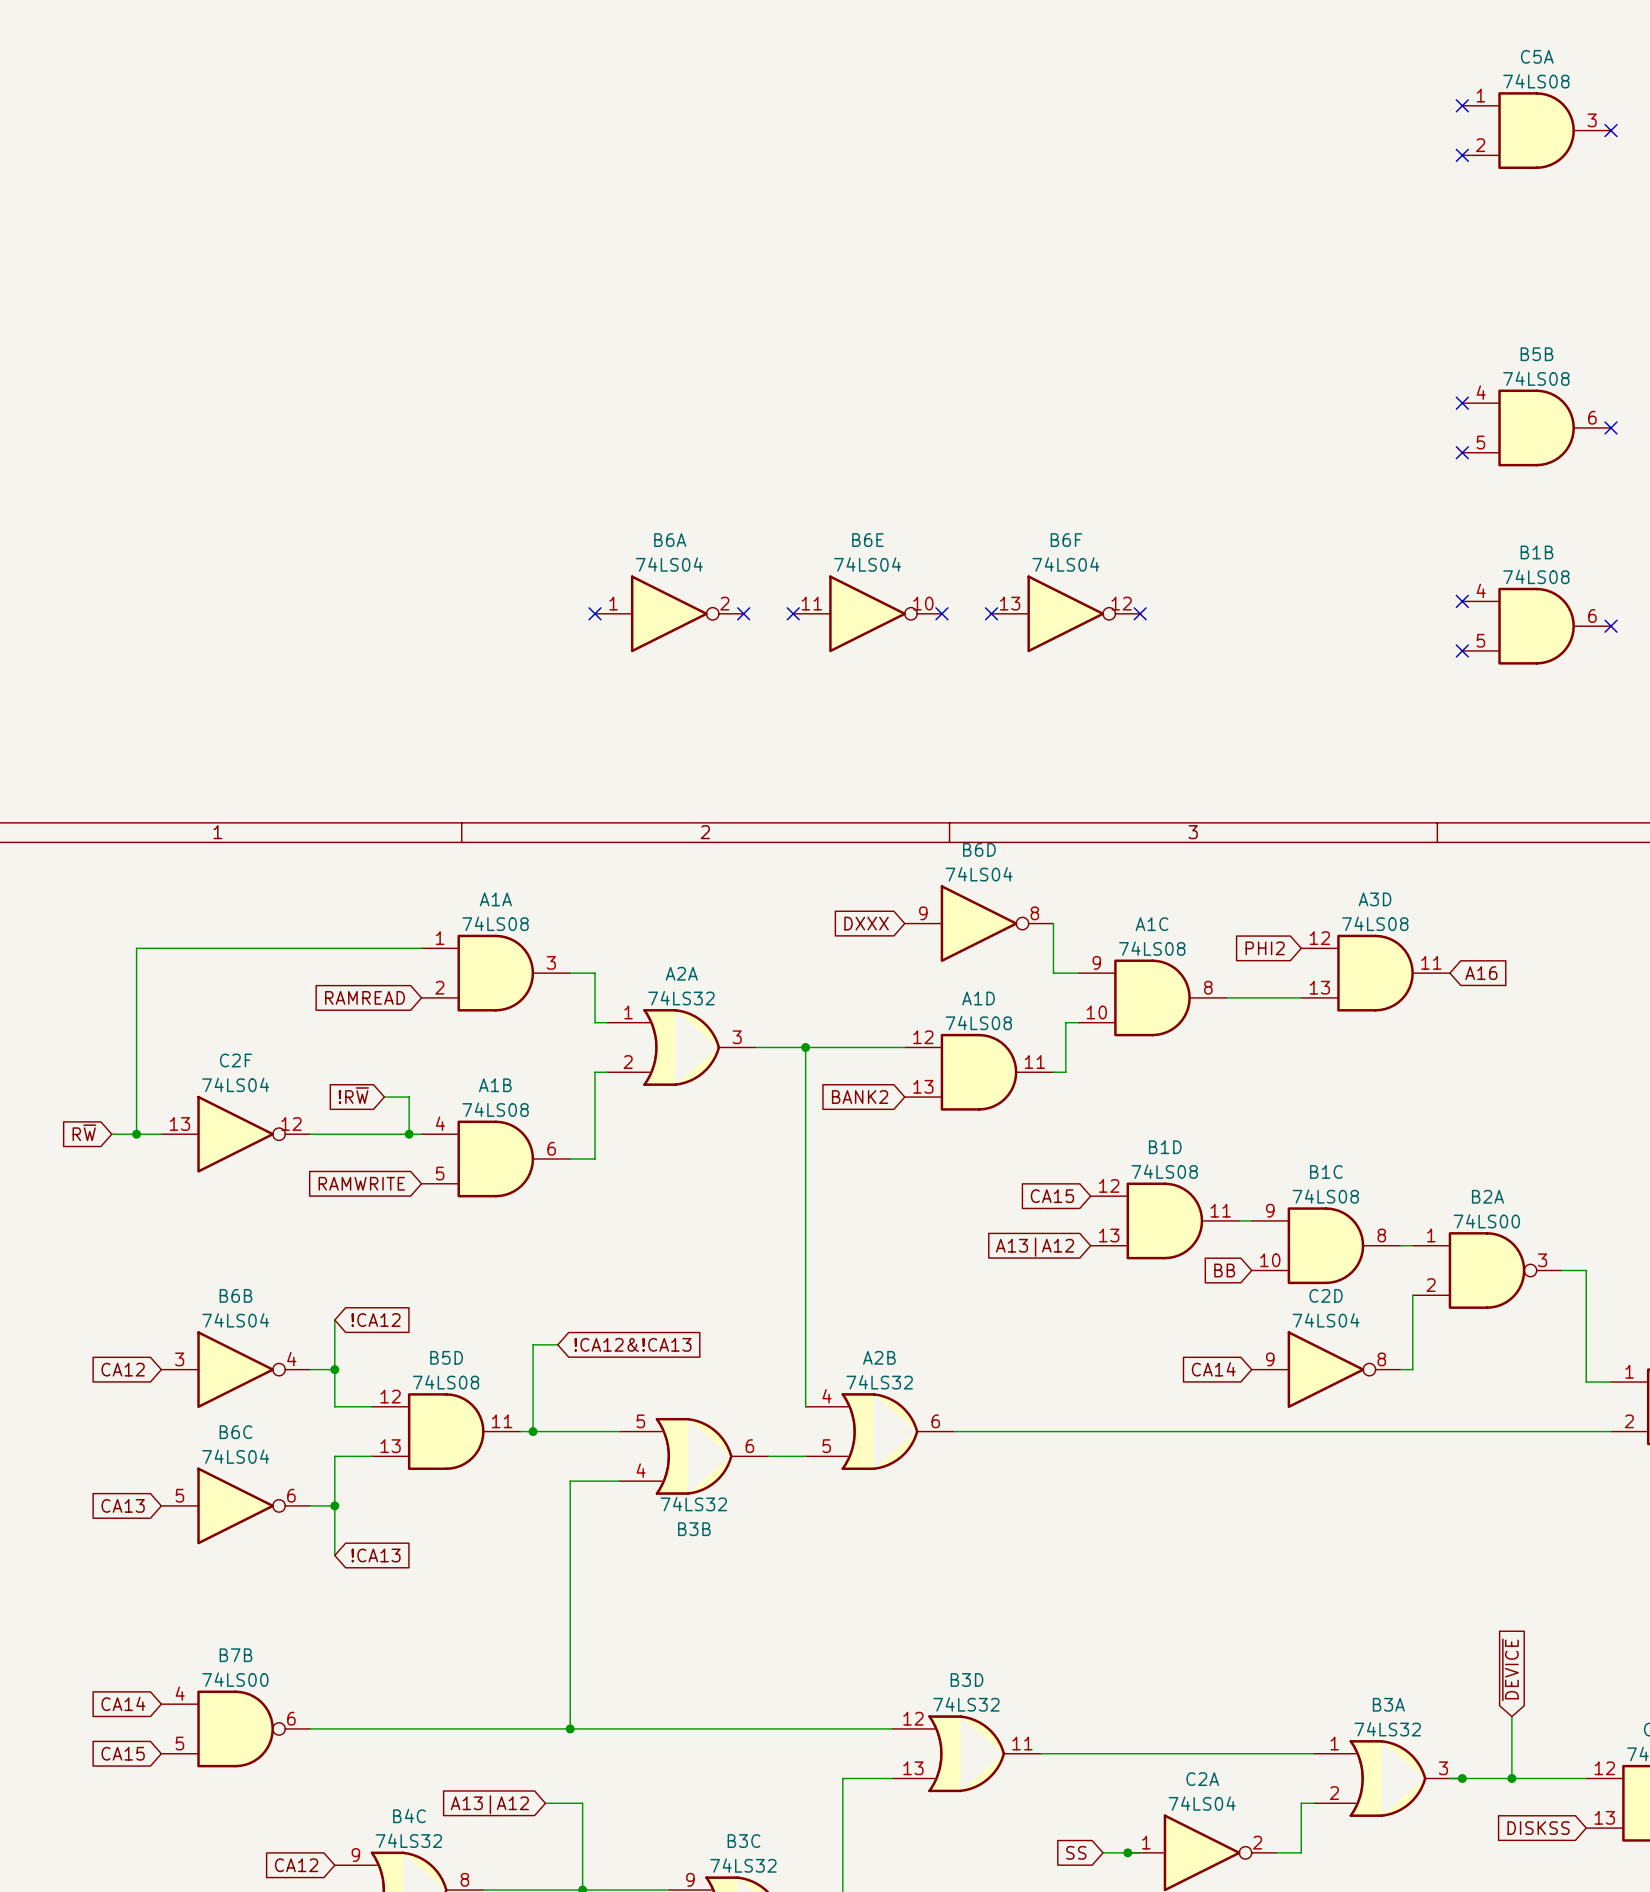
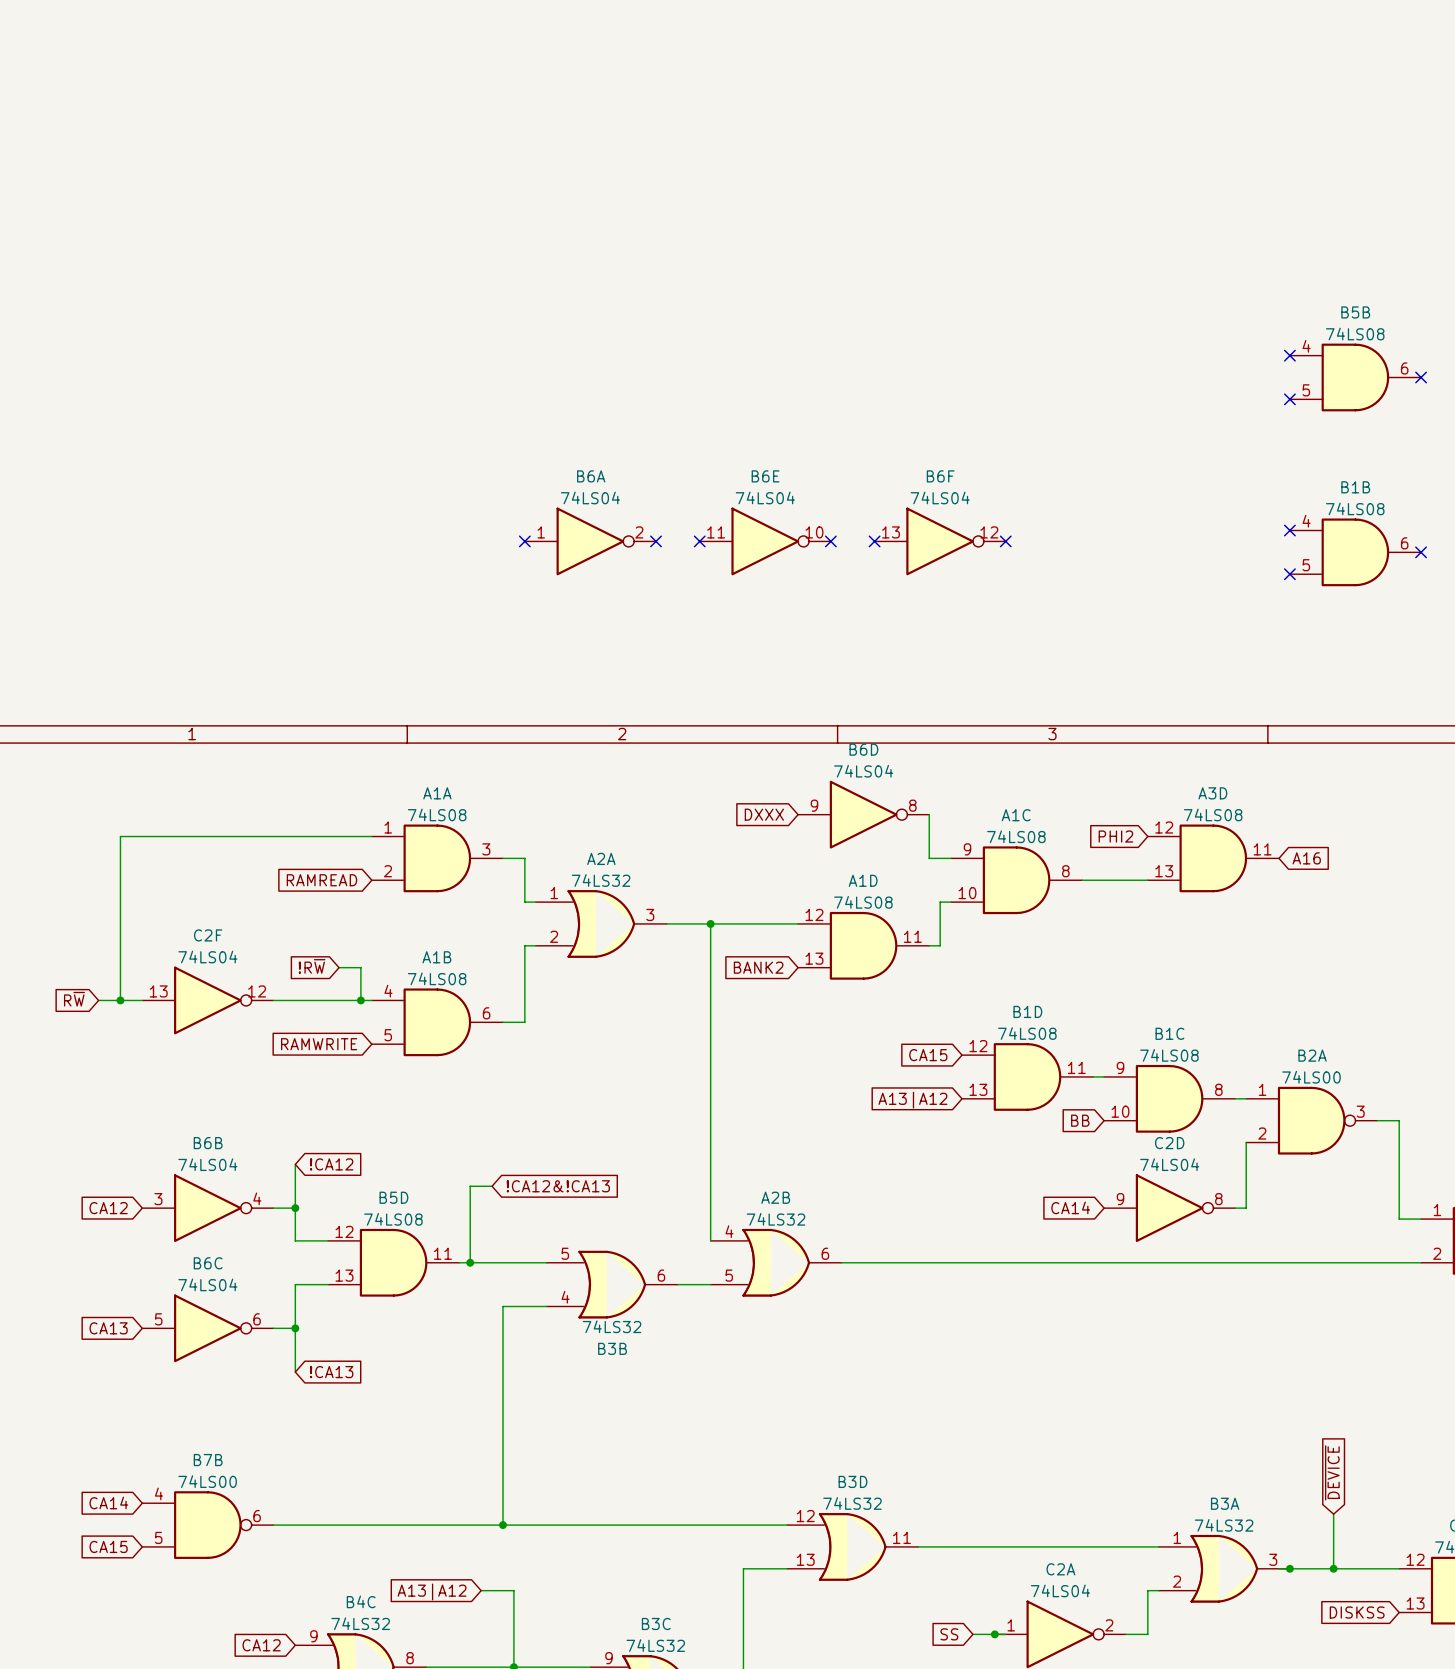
no-connect mark: (1462, 105) -> none
C5A: 74LS08 (1536, 130) -> none
no-connect mark: (1611, 130) -> none
no-connect mark: (1462, 155) -> none

